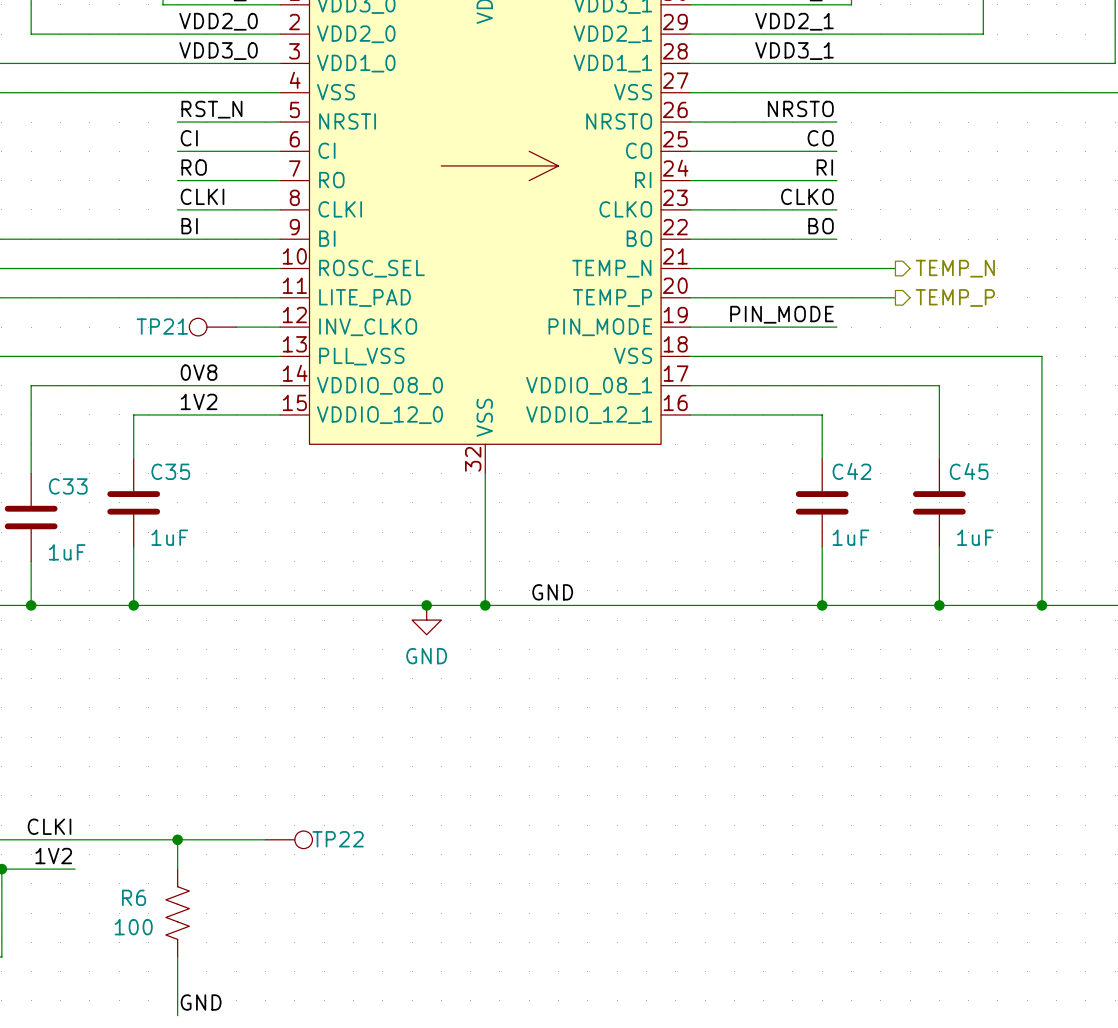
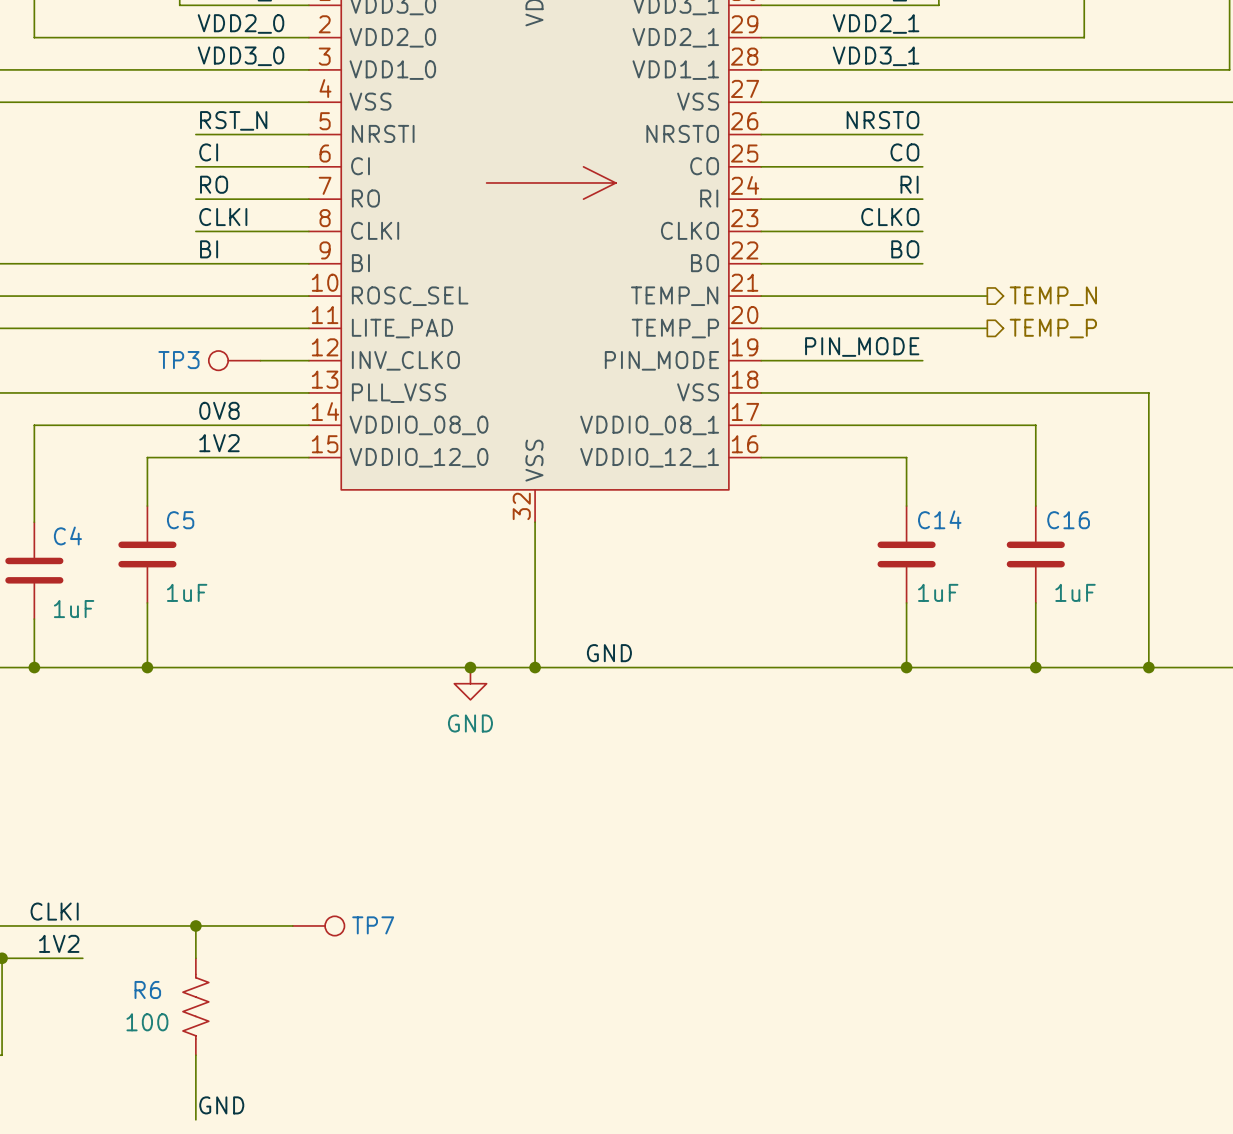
TP21 name: TP21 (162, 326) -> TP3 (178, 360)
C35 name: C35 (170, 471) -> C5 (180, 520)
C42 name: C42 (851, 471) -> C14 (939, 519)
C45 name: C45 (969, 471) -> C16 (1068, 520)
C33 name: C33 (68, 486) -> C4 (67, 535)
TP22 name: TP22 (338, 839) -> TP7 (373, 925)

